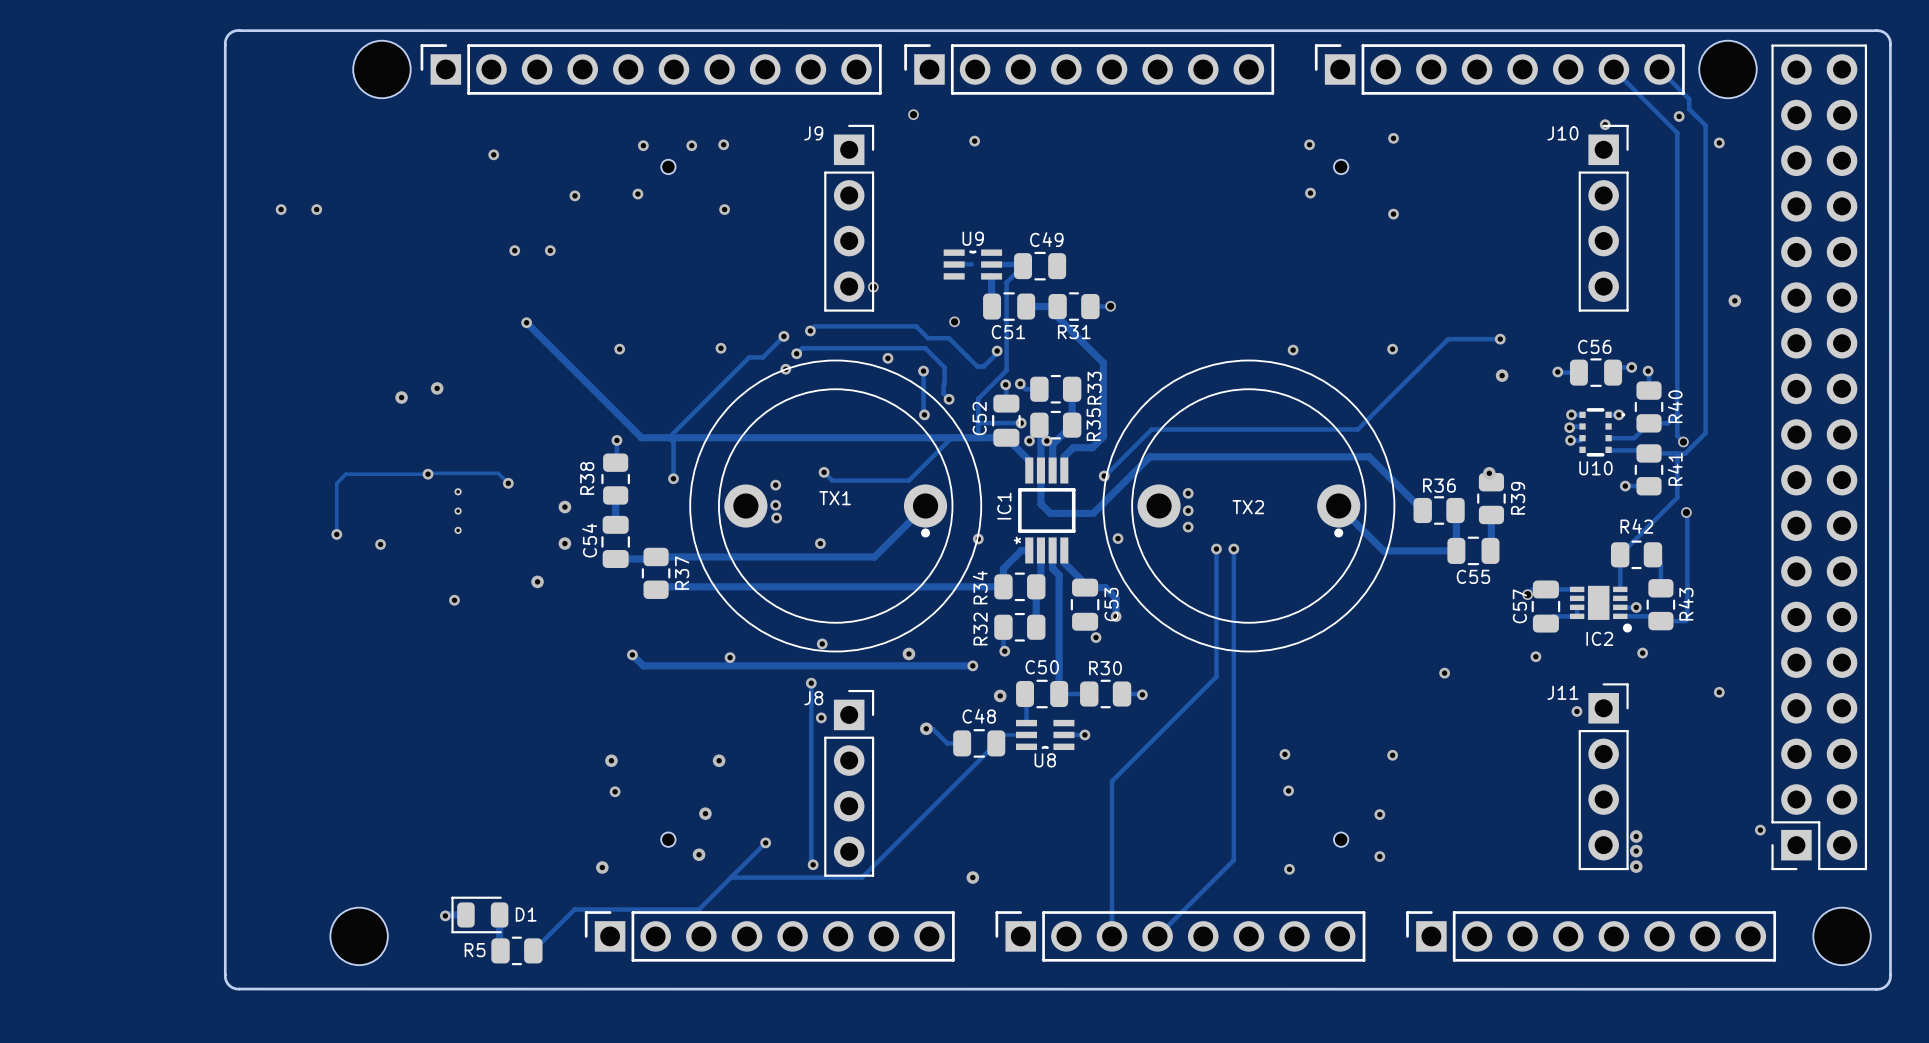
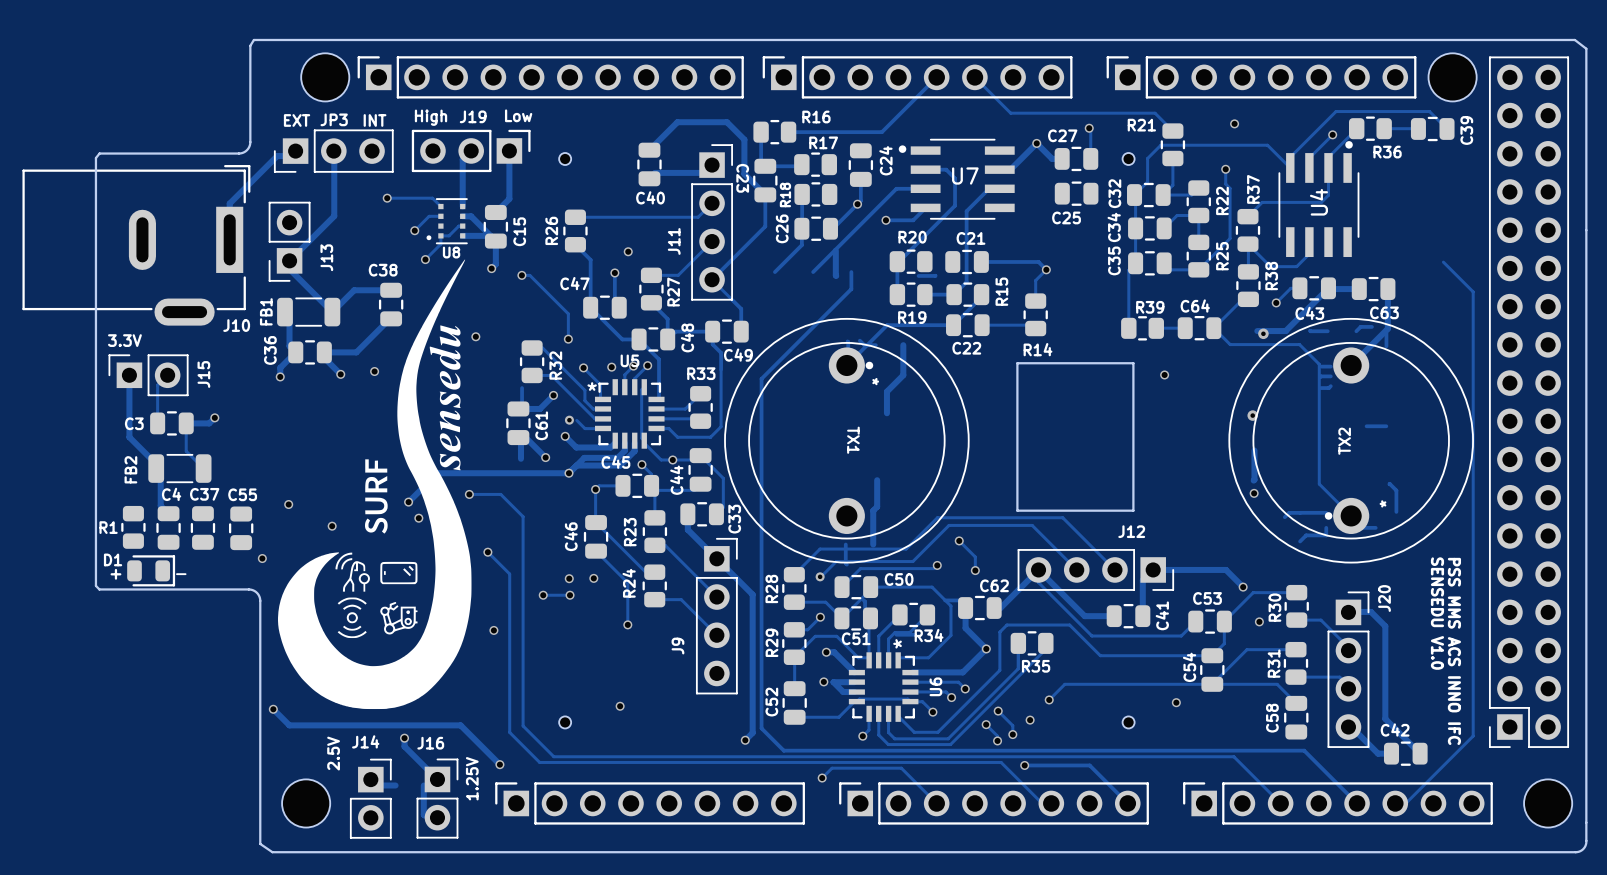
board edge: (239, 30) (229, 34) (225, 43) (225, 974) -> none
board edge: (240, 30) (1877, 30) (1887, 35) (1890, 44) -> none
board edge: (1890, 44) (1890, 976) (1888, 982) (1884, 987) (1877, 989) (237, 989) (229, 985) (225, 974) -> none
track: none -> (936, 77) (881, 132) (788, 132)
track: none -> (974, 77) (1010, 113) (1155, 113) (1172, 131)
track: (1613, 69) (1677, 132) (1677, 435) (1683, 441) -> none
track: (1659, 69) (1689, 99) (1689, 109) (1705, 125) (1705, 433) (1685, 453) (1649, 453) (1646, 450) (1608, 449) -> none
via: (913, 114) -> none
via: (1679, 116) -> none
text: none -> EXT (297, 120)
text: none -> INT (375, 120)
via: none -> (1234, 123)
J10 footprint: [1578, 124, 1629, 312] -> [22, 165, 251, 326]
via: (1605, 124) -> none
track: none -> (1089, 128) (1090, 158)
via: none -> (1089, 128)
track: none -> (1356, 128) (1328, 157) (1328, 195) (1321, 202) (1262, 202) (1247, 216)
track: none -> (1384, 128) (1418, 128)
C39: none -> (1432, 128)
track: none -> (1447, 128) (1429, 111) (1336, 111) (1290, 157) (1290, 167) (1267, 145) (1160, 145) (1147, 158) (1147, 181) (1134, 195) (1135, 263) (1128, 270) (1128, 328)
J9 name rotation: 0° (813, 133) -> 90° counterclockwise (677, 646)
J9 name position: J9 (813, 133) -> J9 (677, 646)
J10 name position: J10 (1562, 133) -> J10 (236, 325)
track: none -> (761, 132) (761, 162) (765, 166) (800, 166) (801, 164)
R16: none -> (774, 132)
via: (1393, 138) -> none
track: none -> (1332, 134) (1309, 158) (1309, 167)
via: none -> (1332, 134)
via: (974, 141) -> none
via: (1719, 142) -> none
via: (723, 144) -> none
via: (1309, 144) -> none
via: (643, 145) -> none
via: (691, 145) -> none
via: none -> (1036, 143)
R21: none -> (1172, 144)
via: (493, 154) -> none
track: none -> (649, 150) (677, 122) (726, 122) (744, 139) (744, 173) (765, 194) (765, 226) (712, 279) (741, 308) (741, 331)
JP3: none -> (333, 151)
track: none -> (471, 150) (462, 159) (462, 206)
J19: none -> (471, 150)
track: none -> (509, 150) (509, 198) (495, 212)
track: none -> (296, 156) (277, 156) (229, 203) (229, 239)
track: none -> (334, 156) (334, 216) (289, 260) (289, 269) (332, 312) (354, 290) (391, 290)
track: none -> (1062, 158) (1052, 158) (1036, 143) (1010, 169) (999, 169)
C27: none -> (1076, 158)
track: none -> (1172, 158) (1172, 185) (1163, 195) (1191, 195) (1198, 188)
C40: none -> (649, 164)
R17: none -> (815, 164)
track: none -> (712, 165) (704, 172) (655, 172) (649, 178)
C24: none -> (860, 165)
track: none -> (925, 169) (946, 169) (955, 178) (955, 205) (897, 261) (897, 294)
track: none -> (1225, 169) (1225, 184) (1230, 188) (1230, 238) (1198, 269) (1170, 269) (1164, 263)
via: none -> (1225, 169)
track: none -> (860, 179) (860, 200) (833, 228) (830, 228)
U7: none -> (956, 179)
C23: none -> (765, 180)
via: (1310, 193) -> none
via: (637, 194) -> none
via: (574, 195) -> none
track: none -> (925, 188) (896, 188) (813, 272)
track: none -> (999, 188) (989, 188) (966, 211) (966, 282) (954, 294) (924, 294)
C25: none -> (1076, 193)
via: (281, 209) -> none
via: (316, 209) -> none
via: (724, 209) -> none
track: none -> (802, 194) (801, 245) (774, 272)
R18: none -> (815, 194)
C32: none -> (1148, 195)
track: none -> (387, 198) (432, 198) (440, 206)
via: none -> (387, 198)
via: (1393, 214) -> none
U4: none -> (1318, 199)
J9 position: (849, 218) -> (716, 616)
R22: none -> (1198, 201)
track: none -> (712, 203) (698, 217) (575, 217)
via: none -> (857, 204)
track: none -> (925, 207) (913, 220) (885, 220)
track: none -> (440, 216) (429, 216) (414, 230)
track: none -> (462, 216) (471, 216) (495, 241) (495, 264) (491, 268)
C49 name position: C49 (1046, 239) -> C49 (738, 355)
via: none -> (885, 220)
J11: none -> (712, 222)
track: none -> (462, 226) (458, 226) (449, 235) (440, 235) (440, 244) (425, 259)
C15: none -> (495, 226)
C34: none -> (1149, 228)
track: none -> (1164, 228) (1177, 215) (1198, 215) (1198, 242)
via: (514, 250) -> none
via: (550, 250) -> none
C26: none -> (816, 228)
C49 footprint: [1014, 251, 1067, 281] -> [705, 319, 749, 344]
via: none -> (414, 230)
R26: none -> (575, 230)
track: none -> (462, 235) (490, 235)
track: (954, 264) (971, 264) -> none
U9: (972, 264) -> none
track: (991, 264) (1021, 264) (1023, 266) (1006, 282) (1006, 370) (978, 398) (978, 437) -> none
J13: none -> (289, 241)
track: none -> (712, 241) (678, 275) (651, 275)
track: none -> (1309, 242) (1309, 253) (1296, 266) (1270, 266) (1247, 244)
track: none -> (575, 244) (590, 259) (590, 307) (622, 339) (639, 339) (659, 359) (659, 399)
track: none -> (1248, 244) (1248, 271)
via: none -> (628, 251)
R25: none -> (1198, 256)
drawing: none -> [278, 259, 472, 710]
via: none -> (425, 259)
via: (873, 287) -> none
R20: none -> (911, 261)
C21: none -> (967, 261)
track: none -> (981, 261) (1038, 261) (1046, 269) (1035, 280) (1035, 301)
track: none -> (1443, 262) (1473, 291) (1473, 736) (1405, 803) (1395, 803)
C35: none -> (1149, 263)
C51 footprint: [983, 292, 1036, 321] -> [834, 606, 879, 631]
R31 footprint: [1048, 292, 1100, 321] -> [1283, 641, 1309, 685]
via: none -> (491, 268)
via: none -> (1046, 269)
via: (1734, 300) -> none
track: none -> (851, 272) (851, 289) (761, 378) (761, 728) (783, 750) (1304, 750) (1357, 803)
track: none -> (614, 272) (614, 303) (619, 307)
via: none -> (614, 272)
track: none -> (521, 275) (529, 275) (568, 313) (568, 339)
via: none -> (521, 275)
track: (1026, 306) (1057, 306) (1057, 317) (1103, 362) (1103, 436) (1092, 447) (1073, 447) (1064, 456) (1064, 470) -> none
via: (1110, 306) -> none
track: none -> (1298, 287) (1290, 288) (1276, 302)
via: (954, 321) -> none
C43: none -> (1314, 288)
track: (526, 322) (641, 437) (1006, 437) (1029, 460) (1029, 470) -> none
via: (526, 322) -> none
R27: none -> (651, 289)
track: none -> (1359, 289) (1328, 288) (1285, 331) (1257, 331)
C63: none -> (1373, 289)
track: none -> (1387, 289) (1387, 328) (1351, 365)
R19: none -> (911, 294)
R15: none -> (967, 294)
track: none -> (981, 294) (981, 297) (953, 325) (887, 325) (846, 365)
track: (810, 330) (814, 326) (916, 326) (928, 338) (949, 338) (977, 366) (983, 366) (997, 351) -> none
via: (810, 330) -> none
R31 name position: R31 (1074, 332) -> R31 (1274, 663)
track: none -> (1248, 299) (1242, 299) (1213, 328) (1230, 344) (1299, 344) (1319, 364) (1319, 484) (1351, 515)
track: (783, 336) (762, 357) (749, 357) (668, 437) (673, 442) (673, 478) -> none
via: (783, 336) -> none
track: none -> (651, 302) (667, 319) (667, 339) (675, 331) (712, 331) (712, 344) (721, 352) (721, 426) (710, 437)
via: none -> (1276, 302)
track: (1500, 339) (1448, 339) (1357, 429) (1151, 429) (1104, 476) -> none
via: (1500, 339) -> none
C38: none -> (391, 304)
C47: none -> (604, 307)
via: (720, 348) -> none
track: none -> (289, 312) (289, 346) (295, 352) (280, 367) (280, 376)
FB1: none -> (308, 312)
via: (619, 349) -> none
via: (1392, 349) -> none
via: (1293, 350) -> none
via: (997, 351) -> none
R14: none -> (1035, 314)
track: (796, 353) (802, 348) (925, 348) (944, 367) (943, 393) (949, 399) -> none
via: (796, 353) -> none
track: none -> (391, 318) (356, 352) (324, 352) (324, 357) (340, 374)
via: (887, 358) -> none
C22: none -> (967, 325)
track: none -> (982, 325) (1032, 325) (1035, 328)
via: (1631, 367) -> none
track: none -> (1156, 328) (1185, 328)
C64: none -> (1199, 328)
via: (785, 369) -> none
track: (923, 371) (924, 414) -> none
via: (923, 371) -> none
via: (1557, 371) -> none
via: (1648, 371) -> none
C56: (1596, 372) -> none
R33 footprint: [1030, 374, 1082, 404] -> [688, 386, 713, 429]
via: none -> (475, 336)
via: none -> (568, 339)
via: (1020, 383) -> none
via: (1005, 384) -> none
via: (437, 388) -> none
R33 name position: R33 (1094, 388) -> R33 (701, 373)
track: none -> (532, 348) (542, 348) (584, 390) (584, 400) (593, 409) (600, 409)
C52 footprint: [992, 394, 1021, 447] -> [782, 681, 807, 725]
C36: none -> (310, 352)
via: (401, 397) -> none
via: (949, 399) -> none
R40: (1649, 406) -> none
R35 footprint: [1030, 410, 1082, 440] -> [1010, 631, 1054, 656]
board edge: none -> (1017, 363) (1133, 363) (1133, 510) (1017, 510) (1017, 363)
track: none -> (647, 365) (634, 378) (634, 384)
via: none -> (647, 365)
track: (1677, 413) (1667, 423) (1649, 423) (1634, 438) (1608, 438) -> none
track: none -> (633, 366) (624, 374) (624, 384)
via: none -> (633, 366)
via: (924, 414) -> none
via: (1571, 414) -> none
via: (1618, 414) -> none
via: none -> (611, 367)
track: none -> (583, 367) (600, 384) (600, 399)
via: none -> (583, 367)
via: none -> (374, 371)
track: (978, 422) (1021, 423) -> none
via: (1021, 423) -> none
via: none -> (340, 374)
R35 name position: R35 (1093, 424) -> R35 (1036, 666)
via: none -> (1164, 374)
track: none -> (129, 375) (129, 437) (160, 468) (160, 505) (168, 513)
J15: none -> (148, 375)
track: none -> (167, 375) (157, 385) (157, 423)
track: none -> (532, 375) (551, 375) (594, 418) (600, 418)
track: (1039, 425) (1040, 426) (1040, 503) (1050, 513) (1093, 513) (1149, 456) (1369, 456) (1422, 510) -> none
via: none -> (280, 376)
via: (1569, 427) -> none
U10: (1602, 432) -> none
track: (952, 437) (908, 480) (832, 480) (824, 472) -> none
track: none -> (644, 387) (641, 389) (641, 438) (644, 440)
via: (616, 440) -> none
via: (1029, 440) -> none
via: (1046, 440) -> none
via: (1570, 440) -> none
via: (1683, 441) -> none
track: none -> (700, 393) (685, 409) (659, 409)
track: none -> (553, 395) (539, 408) (518, 408)
via: none -> (553, 395)
R38 footprint: [601, 453, 630, 505] -> [1236, 264, 1261, 308]
track: (1676, 453) (1677, 497) (1620, 554) (1620, 589) -> none
R41: (1649, 469) -> none
U5: none -> (629, 413)
via: (824, 472) -> none
R39 footprint: [1477, 472, 1506, 525] -> [1121, 316, 1164, 341]
via: (428, 474) -> none
track: none -> (214, 417) (209, 423) (186, 423) (186, 451) (206, 471)
via: none -> (214, 417)
via: (1104, 476) -> none
track: none -> (659, 418) (698, 418) (700, 421)
R38 name position: R38 (587, 478) -> R38 (1271, 276)
track: none -> (576, 420) (585, 428) (600, 428)
C3: none -> (171, 423)
C61: none -> (518, 423)
track: (508, 483) (498, 473) (345, 474) (336, 483) (336, 534) -> none
via: (508, 483) -> none
via: (775, 485) -> none
R36 name position: R36 (1439, 485) -> R36 (1387, 152)
via: (1625, 486) -> none
track: none -> (659, 428) (668, 428) (677, 437) (710, 437)
via: (1188, 493) -> none
R36 footprint: [1413, 496, 1465, 525] -> [1349, 116, 1392, 141]
track: none -> (565, 436) (576, 447) (610, 447) (615, 443)
via: none -> (565, 436)
track: none -> (518, 437) (525, 437) (545, 457)
part: none -> (846, 440)
part: none -> (1351, 440)
via: (775, 505) -> none
track: none -> (624, 443) (624, 450) (617, 457) (584, 457) (568, 473) (437, 473) (408, 502)
track: none -> (634, 443) (634, 451) (620, 465) (576, 465)
track: none -> (644, 443) (661, 459) (696, 459) (700, 455) (723, 478) (723, 507) (716, 514)
part: (835, 506) -> none
track: (925, 506) (874, 556) (656, 556) (654, 559) (615, 559) -> none
part: (1248, 506) -> none
track: (1338, 506) (1383, 550) (1456, 550) (1455, 510) -> none
via: (564, 507) -> none
IC1: (1046, 510) -> none
via: (1188, 510) -> none
part: (458, 511) -> none
track: (1686, 512) (1687, 619) (1685, 621) (1660, 621) (1656, 616) (1620, 616) -> none
via: (1686, 512) -> none
C54 footprint: [601, 515, 630, 568] -> [1200, 648, 1225, 692]
via: (776, 518) -> none
via: none -> (545, 457)
via: none -> (672, 459)
via: (1188, 527) -> none
track: none -> (641, 464) (651, 474) (651, 485) (656, 490) (694, 490) (700, 484)
via: none -> (641, 464)
via: (336, 534) -> none
FB2: none -> (179, 468)
C55 footprint: [1447, 536, 1500, 566] -> [228, 506, 254, 551]
C44: none -> (700, 469)
via: (1118, 538) -> none
via: (978, 539) -> none
via: none -> (568, 473)
via: (564, 543) -> none
via: (820, 543) -> none
via: (380, 544) -> none
R37 footprint: [641, 547, 671, 599] -> [1235, 208, 1261, 252]
track: (1216, 549) (1216, 676) (1112, 781) (1112, 936) -> (822, 778) (832, 768) (901, 768) (936, 803)
via: (1216, 549) -> none
track: (1233, 549) (1233, 860) (1157, 936) -> none
via: (1233, 549) -> none
track: (1029, 550) (1021, 550) (1003, 568) (1003, 586) (658, 586) (656, 589) -> none
track: (1052, 550) (1052, 568) (1059, 575) (1059, 694) (1089, 694) -> none
track: (1064, 550) (1064, 562) (1085, 583) -> none
R42: (1636, 554) -> none
track: none -> (622, 485) (599, 485) (595, 489) (595, 522) (645, 572) (654, 572)
C45: none -> (637, 485)
via: none -> (595, 489)
track: none -> (654, 489) (654, 517)
track: none -> (469, 494) (500, 494) (523, 516) (523, 725) (553, 756) (1233, 756) (1280, 803)
via: none -> (469, 494)
R34 footprint: [994, 572, 1046, 602] -> [892, 602, 936, 628]
R37 name position: R37 (682, 573) -> R37 (1253, 189)
via: none -> (408, 502)
C55 name position: C55 (1473, 576) -> C55 (242, 494)
C53 footprint: [1070, 578, 1100, 631] -> [1188, 609, 1232, 634]
via: none -> (288, 504)
via: (537, 581) -> none
R34 name position: R34 (980, 587) -> R34 (929, 635)
track: (1085, 587) (1105, 587) (1116, 598) (1116, 616) -> none
track: none -> (687, 514) (687, 529) (752, 594) (752, 732) (745, 740)
C33: none -> (702, 514)
via position: (1527, 594) -> (1254, 493)
via: none -> (418, 518)
via: (454, 600) -> none
C53 name position: C53 (1111, 604) -> C53 (1207, 598)
R43: (1660, 604) -> none
via: none -> (332, 526)
R1: none -> (133, 527)
C57: (1545, 606) -> none
C4: none -> (168, 527)
C37: none -> (202, 527)
via: (1636, 607) -> none
IC2: (1600, 609) -> none
R23: none -> (654, 531)
R32 footprint: [994, 612, 1046, 642] -> [519, 340, 545, 384]
via: (1116, 616) -> none
C46: none -> (596, 536)
track: none -> (959, 540) (975, 557) (975, 570)
via: none -> (959, 540)
track: none -> (654, 545) (665, 545) (716, 597)
R32 name position: R32 (980, 629) -> R32 (555, 365)
track: none -> (596, 551) (627, 582) (627, 624)
track: none -> (487, 552) (509, 574) (509, 732) (539, 762) (1001, 762) (1042, 803) (1051, 803)
via: none -> (487, 552)
via: (1096, 637) -> none
via: none -> (262, 558)
via: (822, 643) -> none
via: (1004, 651) -> none
track: none -> (937, 565) (934, 568) (860, 568) (842, 587)
via: none -> (937, 565)
via: (908, 653) -> none
via: (1642, 653) -> none
track: (632, 654) (643, 665) (972, 665) -> none
via: (632, 654) -> none
via: (1535, 656) -> none
via: (730, 657) -> none
track: none -> (1038, 569) (1038, 582) (1091, 636) (1181, 636) (1195, 621)
track: none -> (1038, 569) (1084, 616) (1114, 616)
track: none -> (1038, 569) (1000, 608) (994, 608)
track: none -> (1076, 569) (1032, 525) (949, 525) (912, 561) (836, 561) (820, 577)
J12: none -> (1095, 569)
track: none -> (1114, 569) (1062, 517) (937, 517) (906, 549) (820, 549) (794, 574)
via: none -> (975, 570)
via: none -> (593, 578)
C50 name position: C50 (1042, 667) -> C50 (899, 579)
via: none -> (569, 578)
R30 name position: R30 (1105, 668) -> R30 (1274, 607)
via: (1444, 673) -> none
R24: none -> (654, 585)
track: none -> (1243, 587) (1226, 569) (1153, 569) (1142, 580) (1142, 616)
via: none -> (1243, 587)
R28: none -> (794, 588)
C50 footprint: [1016, 679, 1069, 709] -> [834, 574, 879, 600]
R30 footprint: [1080, 679, 1132, 709] -> [1284, 584, 1309, 628]
track: (811, 683) (811, 862) (813, 864) -> none
via: (811, 683) -> none
track: none -> (1296, 592) (1253, 592) (1224, 621) (1224, 643) (1212, 655) (1100, 655) (1069, 625) (1006, 625) (999, 632) (999, 670) (937, 732) (914, 732) (898, 716)
track: none -> (543, 595) (570, 595)
via: none -> (543, 595)
via: none -> (570, 595)
J11 name: J11 (1562, 692) -> J20 (1384, 598)
via: (1719, 692) -> none
track: none -> (654, 599) (681, 599) (716, 635)
via: (1142, 694) -> none
via: (1000, 695) -> none
track: none -> (794, 602) (825, 602) (841, 618) (870, 589) (870, 587) (932, 587) (950, 606) (950, 635) (928, 657) (898, 657)
track: none -> (965, 608) (965, 628) (986, 648) (962, 672) (912, 672)
C62: none -> (979, 608)
track: none -> (1351, 611) (1371, 611) (1385, 626) (1385, 718) (1420, 753)
text: none -> SENSEDU V1.0 (1437, 613)
track: none -> (899, 614) (878, 636) (878, 657)
track: none -> (927, 614) (909, 632) (895, 632) (888, 639) (888, 657)
via: (1576, 711) -> none
C41: none -> (1128, 616)
track: none -> (820, 617) (807, 629) (794, 629)
via: none -> (820, 617)
track: none -> (870, 618) (868, 657) (858, 657) (836, 636) (815, 636) (794, 657) (794, 688)
C48 name position: C48 (979, 716) -> C48 (687, 337)
via: (821, 717) -> none
track: none -> (1296, 620) (1320, 620) (1351, 650)
U8 footprint: [1016, 719, 1075, 751] -> [426, 198, 468, 245]
via: none -> (1259, 621)
via: none -> (627, 624)
track: (926, 728) (932, 728) (947, 743) (962, 743) -> none
via: (926, 728) -> none
via: none -> (493, 630)
C48 footprint: [953, 729, 1006, 758] -> [631, 327, 676, 352]
track: (1026, 734) (1004, 734) (862, 877) (731, 877) -> none
via: (1084, 734) -> none
R29: none -> (794, 643)
track: none -> (1018, 643) (1018, 668) (948, 738) (894, 738) (888, 732) (888, 716)
track: none -> (1045, 643) (1045, 649) (950, 744) (888, 744) (878, 735) (878, 716)
via: none -> (986, 648)
track: none -> (1295, 649) (1246, 649) (1212, 684)
via: (1284, 754) -> none
text: none -> PSS MMS ACS INNO IFC (1454, 651)
track: none -> (826, 652) (834, 652) (854, 672)
via: none -> (826, 652)
via: (1392, 755) -> none
via: (611, 760) -> none
via: (719, 760) -> none
J8: (849, 783) -> none
track: none -> (1295, 677) (1339, 677) (1351, 688)
via: (1288, 790) -> none
via: (615, 791) -> none
via: none -> (823, 681)
track: none -> (854, 682) (833, 682) (843, 691) (854, 691)
track: none -> (912, 682) (958, 682) (965, 688)
U6: none -> (883, 687)
via: none -> (965, 688)
track: none -> (912, 691) (946, 691) (951, 697)
via: none -> (951, 697)
track: none -> (1049, 699) (1064, 684) (1277, 684) (1296, 703)
via: none -> (1049, 699)
via: (705, 813) -> none
track: none -> (854, 701) (838, 717) (794, 717)
track: none -> (856, 701) (859, 699) (907, 699) (910, 701)
track: none -> (912, 701) (922, 701) (932, 712)
via: (1379, 814) -> none
via: none -> (1176, 702)
via: none -> (620, 706)
track: none -> (273, 709) (289, 725) (460, 725) (499, 764)
via: none -> (273, 709)
track: none -> (998, 711) (1012, 725) (1012, 734)
via: none -> (998, 711)
via: none -> (932, 712)
via: (1760, 830) -> none
track: none -> (868, 716) (868, 730) (862, 736)
C58: none -> (1296, 717)
via: none -> (1030, 720)
via: (1636, 836) -> none
track: (765, 842) (699, 909) (574, 909) (533, 950) -> none
via: (765, 842) -> none
track: none -> (986, 724) (997, 736) (997, 740)
via: none -> (986, 724)
track: none -> (1351, 726) (1378, 753) (1391, 753)
via: (1636, 851) -> none
via: (699, 854) -> none
via: none -> (1012, 734)
via: none -> (862, 736)
via: (1379, 856) -> none
track: none -> (404, 738) (404, 746) (437, 779)
via: none -> (404, 738)
via: none -> (745, 740)
via: none -> (997, 740)
via: (813, 864) -> none
via: (1636, 866) -> none
via: (602, 867) -> none
via: (1289, 869) -> none
C42: none -> (1405, 753)
via: (972, 877) -> none
via: none -> (499, 764)
track: none -> (1024, 765) (1089, 765) (1127, 803)
via: none -> (1024, 765)
D1 footprint: [451, 896, 509, 934] -> [127, 555, 176, 587]
via: none -> (822, 778)
D1 name position: D1 (526, 914) -> D1 (113, 559)
via: (445, 915) -> none
J14: none -> (370, 798)
J16: none -> (437, 798)
R5: (516, 950) -> none
board edge: none -> (272, 852) (260, 843) (260, 600) (258, 595) (254, 590) (248, 589) (99, 589) (95, 585) (95, 158) (99, 153) (238, 153) (245, 151) (250, 143) (250, 45) (253, 39) (1574, 39) (1586, 48) (1586, 842) (1581, 850) (1575, 852) (272, 852)

